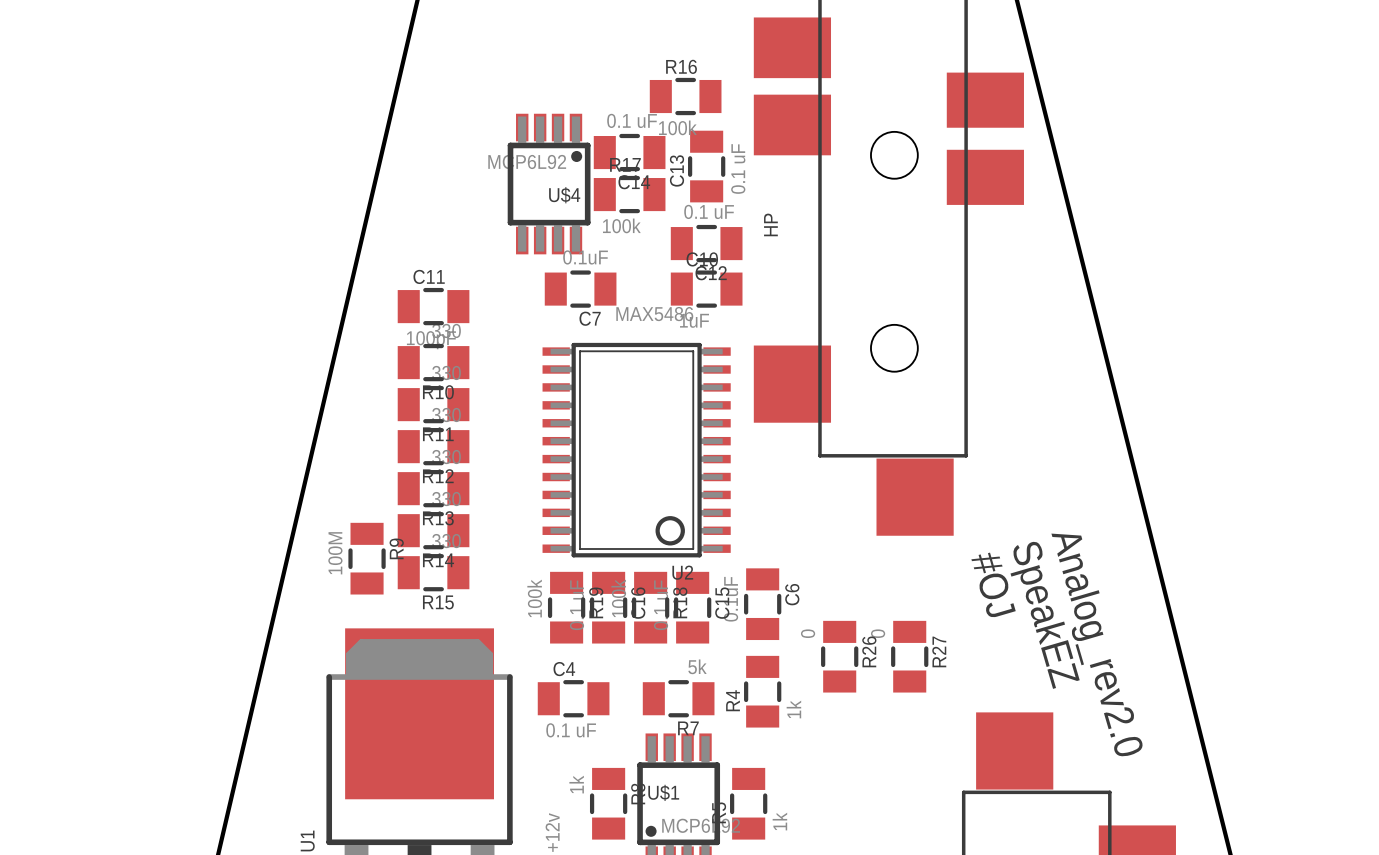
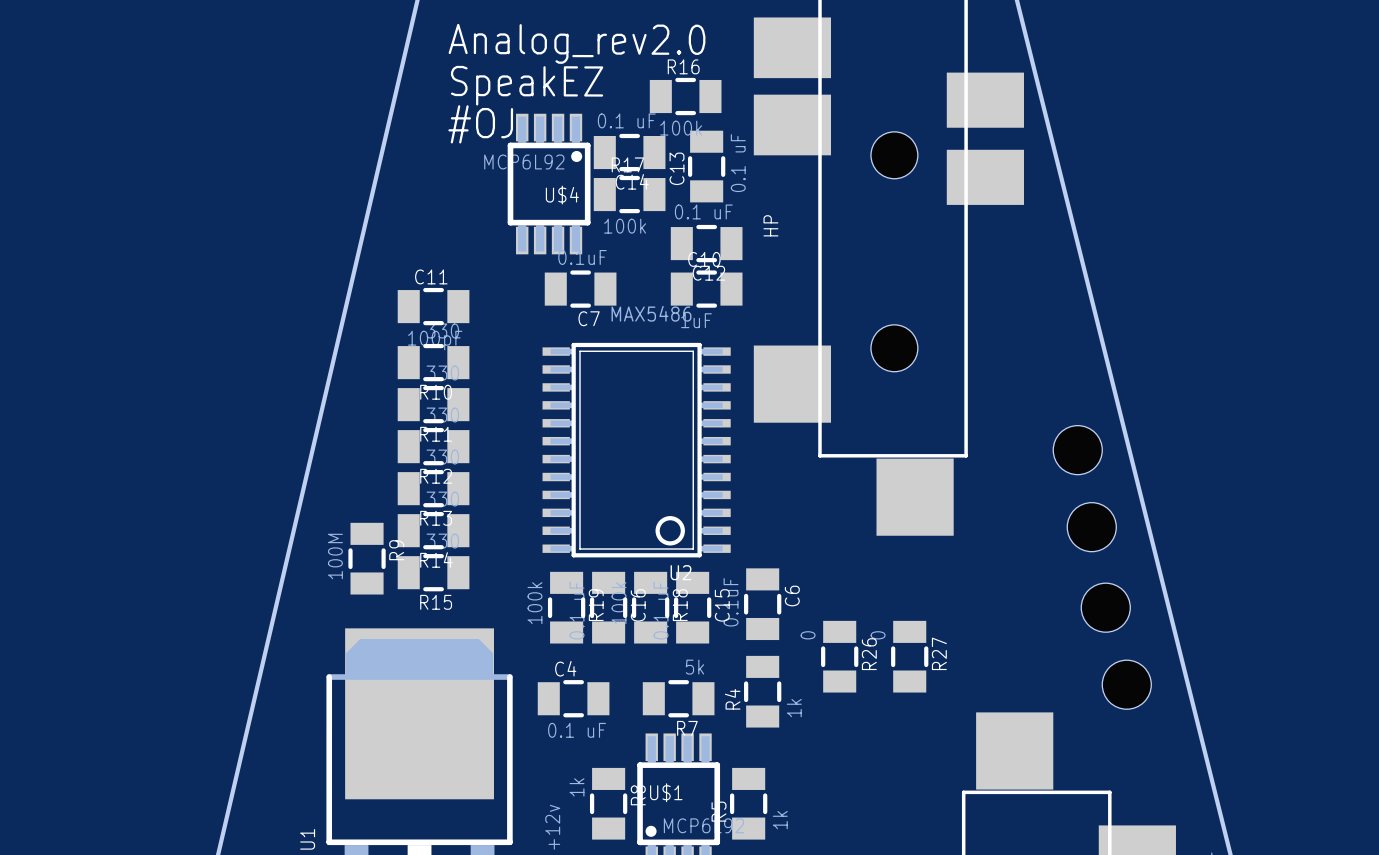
text: none -> Analog_rev2.0 (577, 43)
text: none -> SpeakEZ (527, 85)
hole: none -> (1077, 450)
hole: none -> (1091, 527)
text rotation: 0° (993, 585) -> 73.5° counterclockwise (480, 124)
text position: #OJ (993, 585) -> #OJ (480, 124)
hole: none -> (1105, 607)
text: SpeakEZ (1045, 615) -> none
text: Analog_rev2.0 (1097, 645) -> none
hole: none -> (1126, 684)

